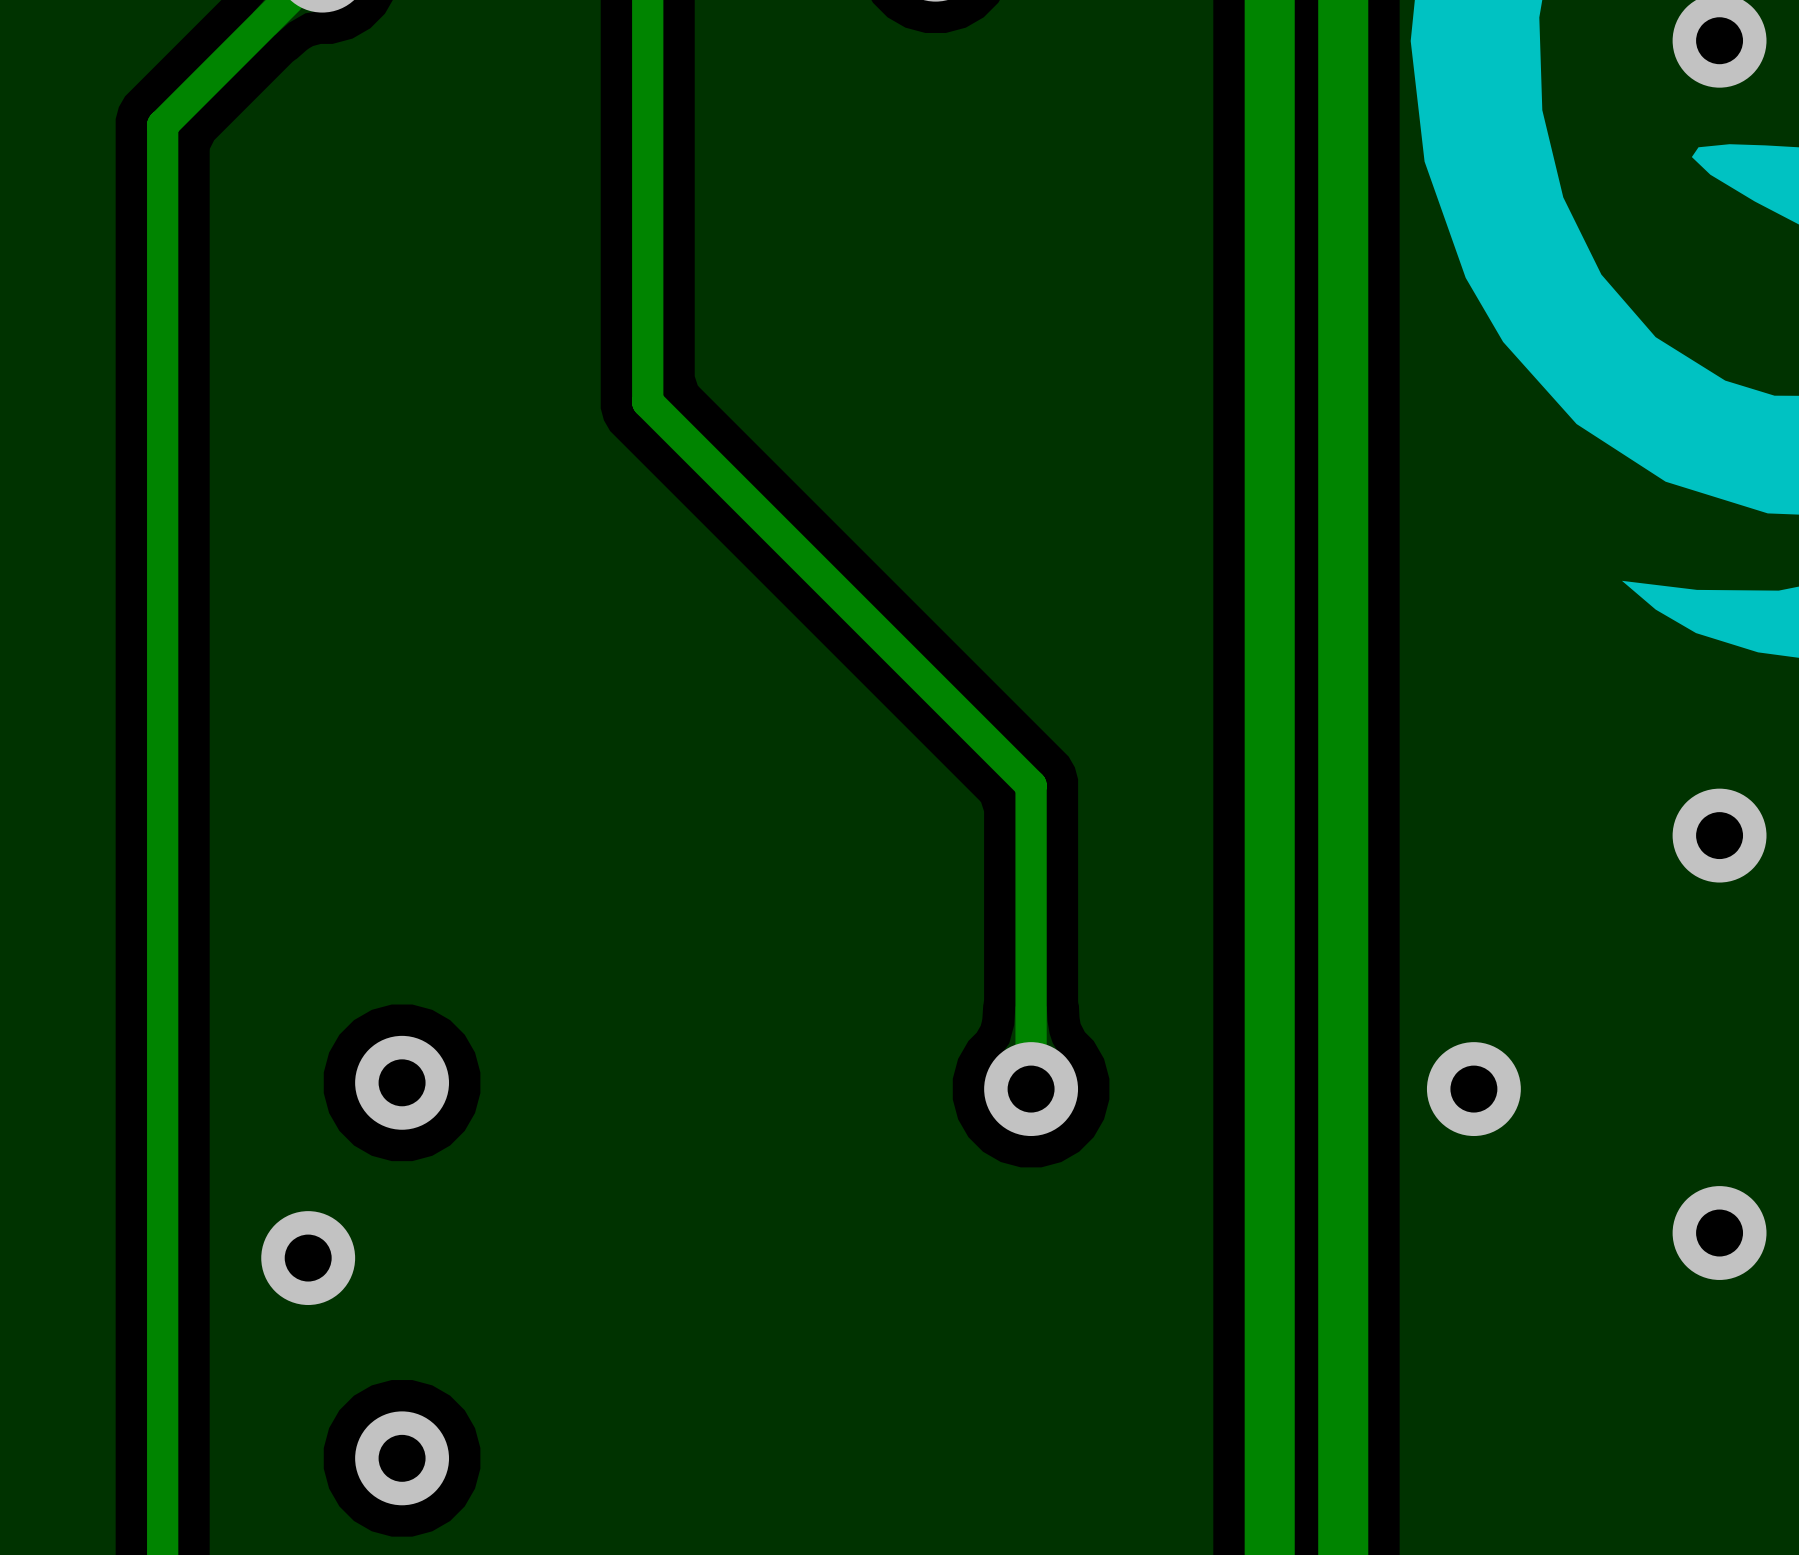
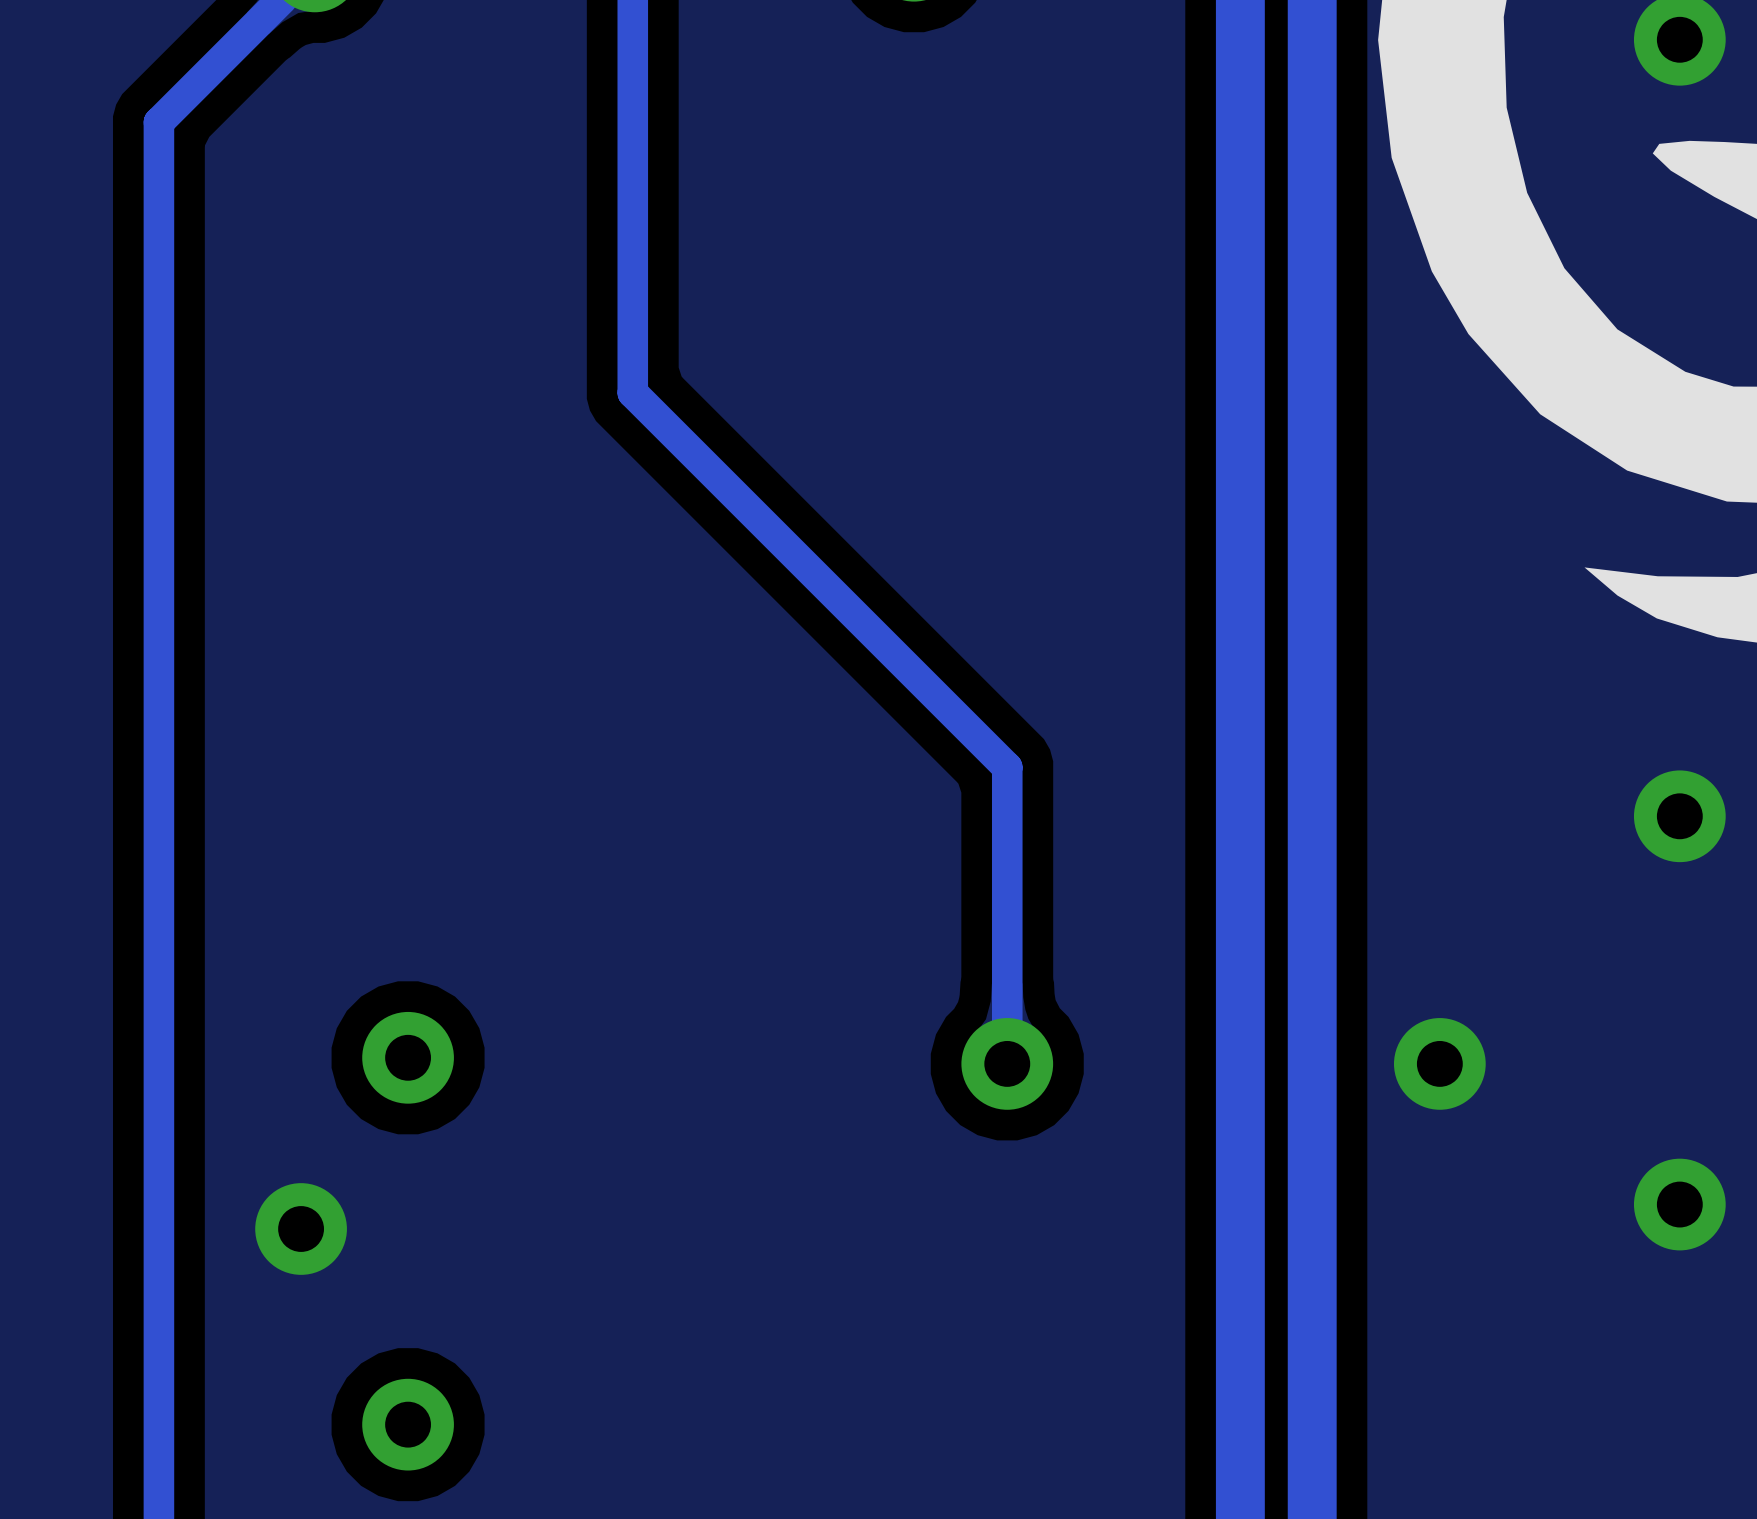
via position: (402, 1082) -> (408, 1057)
via position: (402, 1458) -> (408, 1424)

